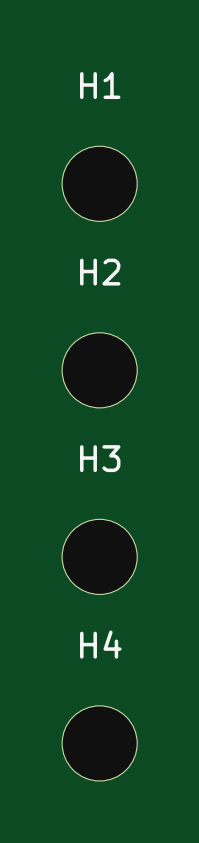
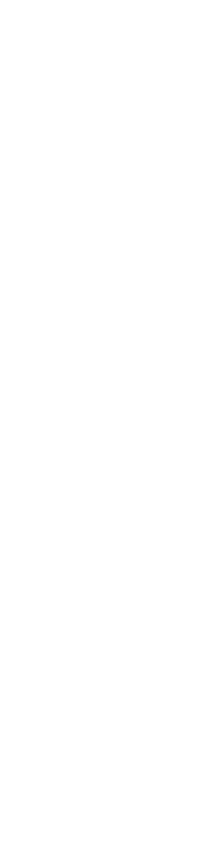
H1: (99, 183) -> none
H2: (99, 370) -> none
H3: (99, 556) -> none
H4: (99, 743) -> none

